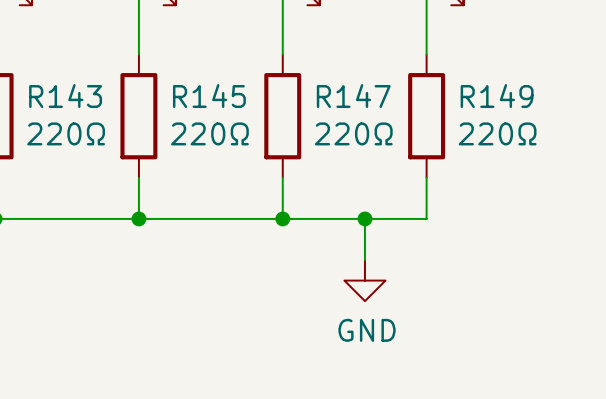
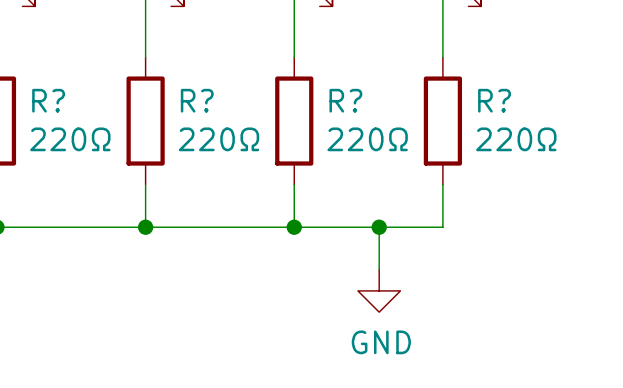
R143 name: R143 (65, 96) -> R? (48, 100)
R145 name: R145 (209, 96) -> R? (197, 100)
R147 name: R147 (353, 96) -> R? (345, 100)
R149 name: R149 (497, 96) -> R? (494, 100)

